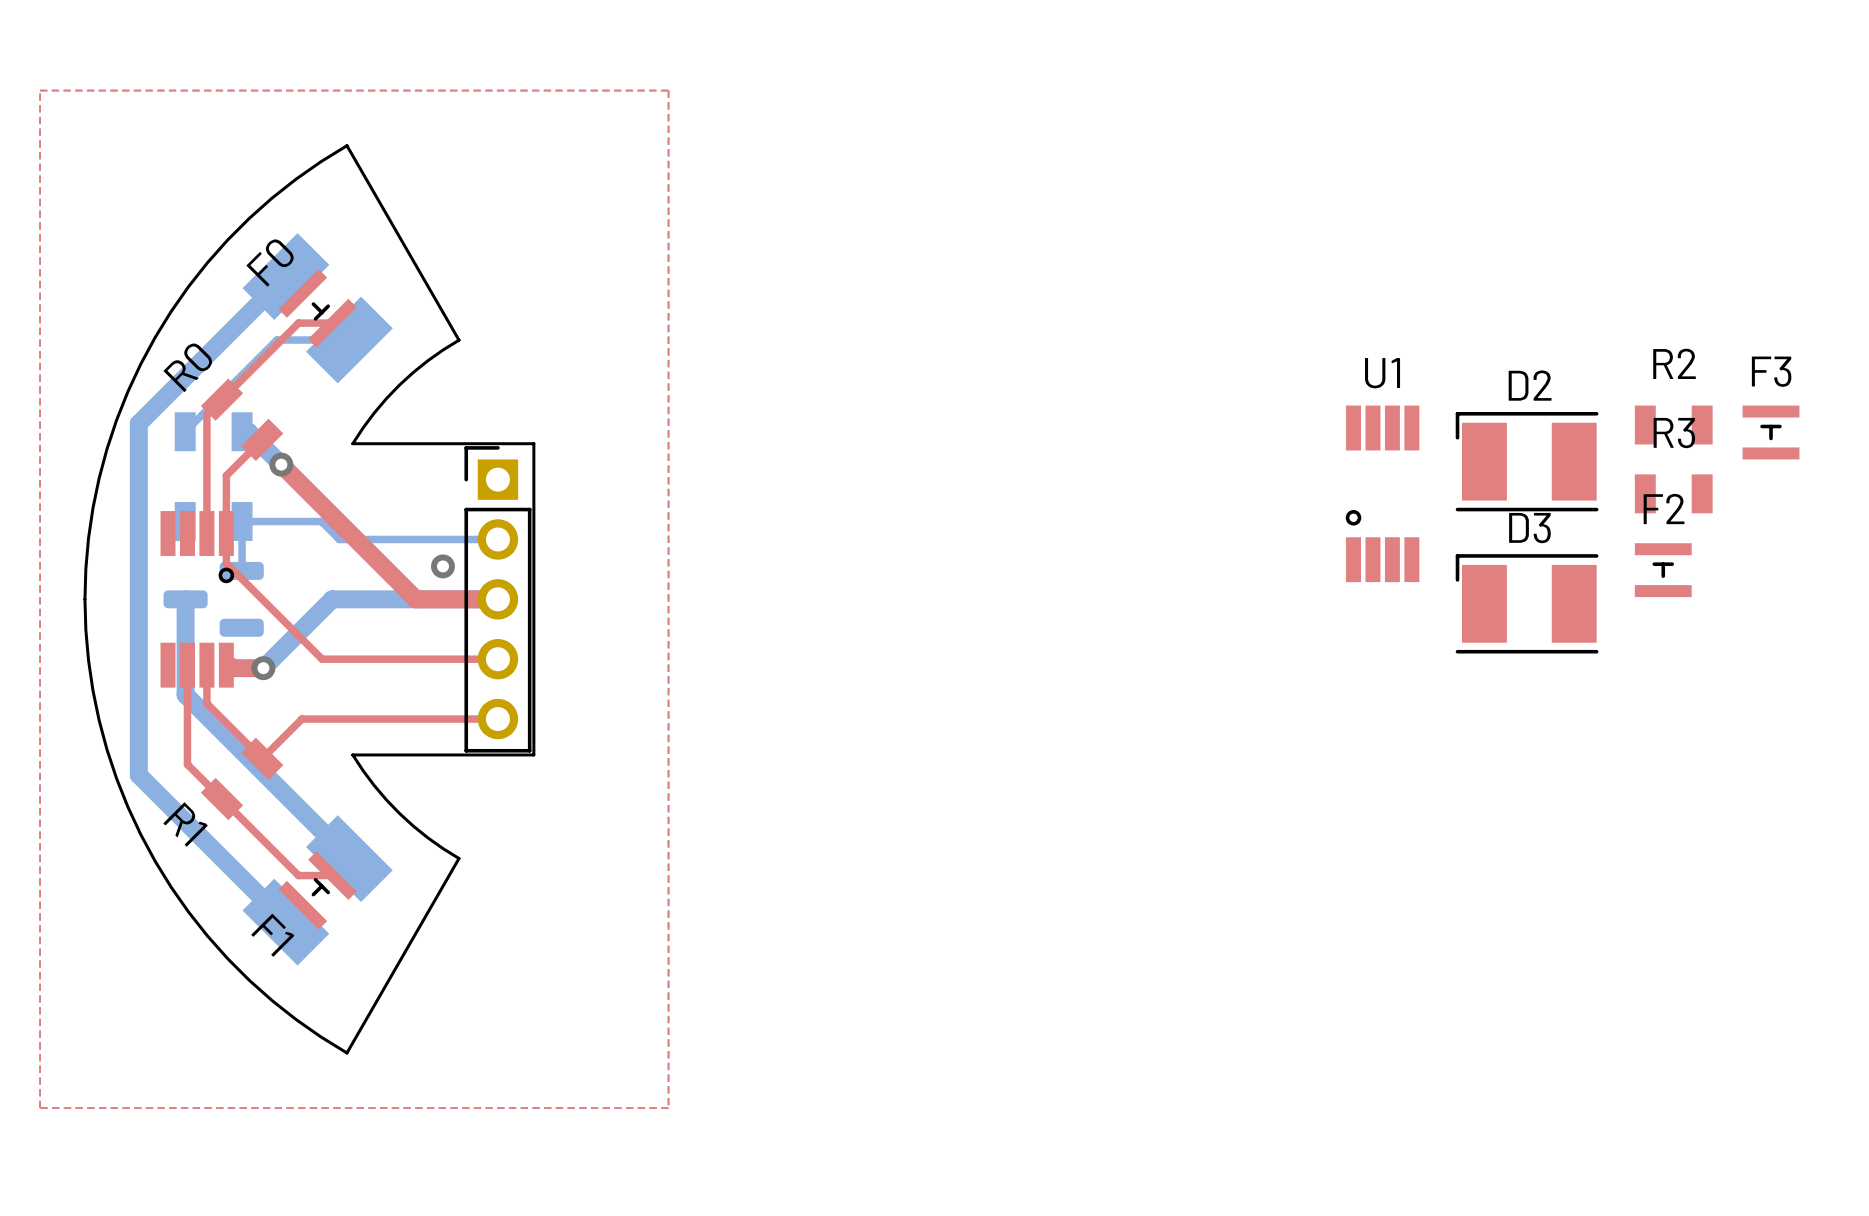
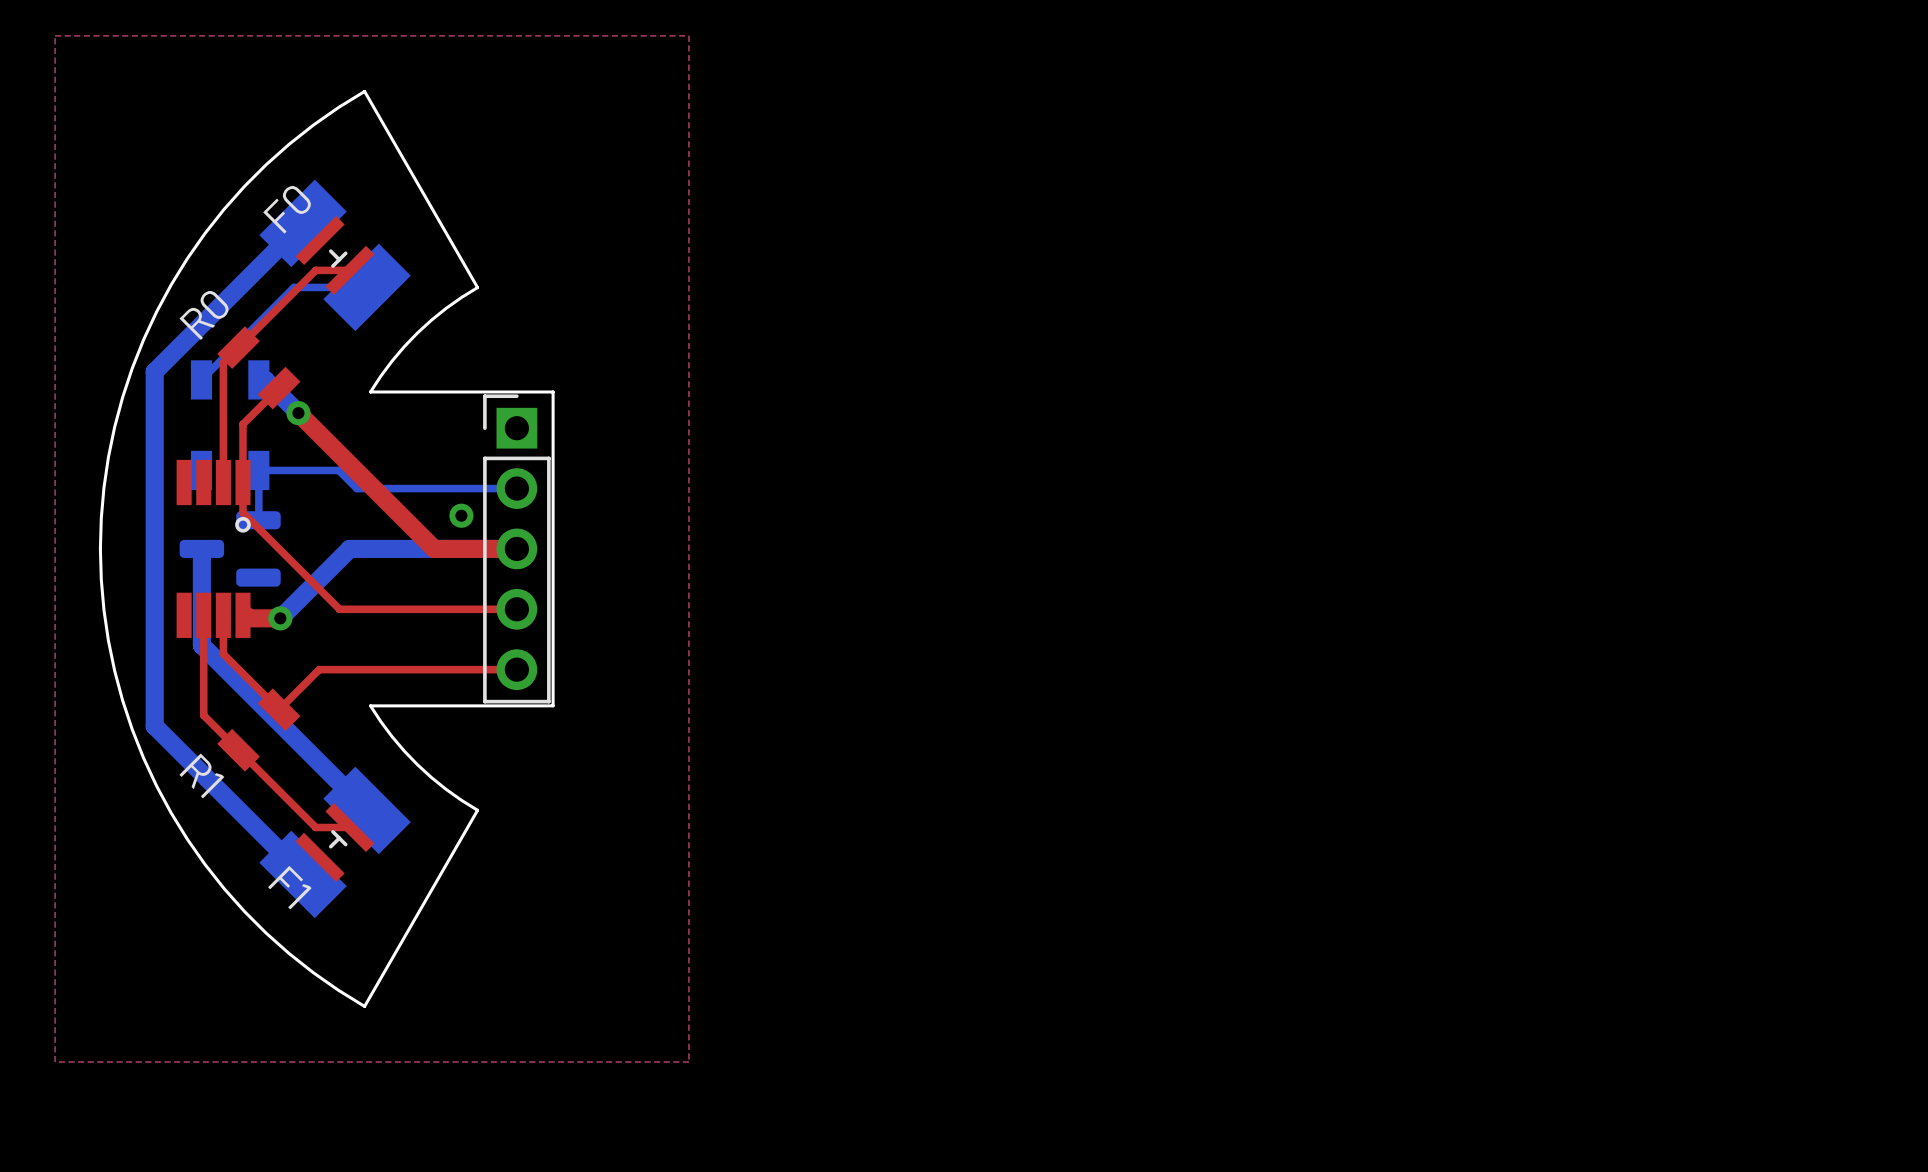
R2: (1673, 425) -> none
F3: (1771, 432) -> none
D2: (1527, 461) -> none
U1: (1382, 493) -> none
R3: (1673, 493) -> none
F2: (1663, 570) -> none
D3: (1527, 603) -> none

